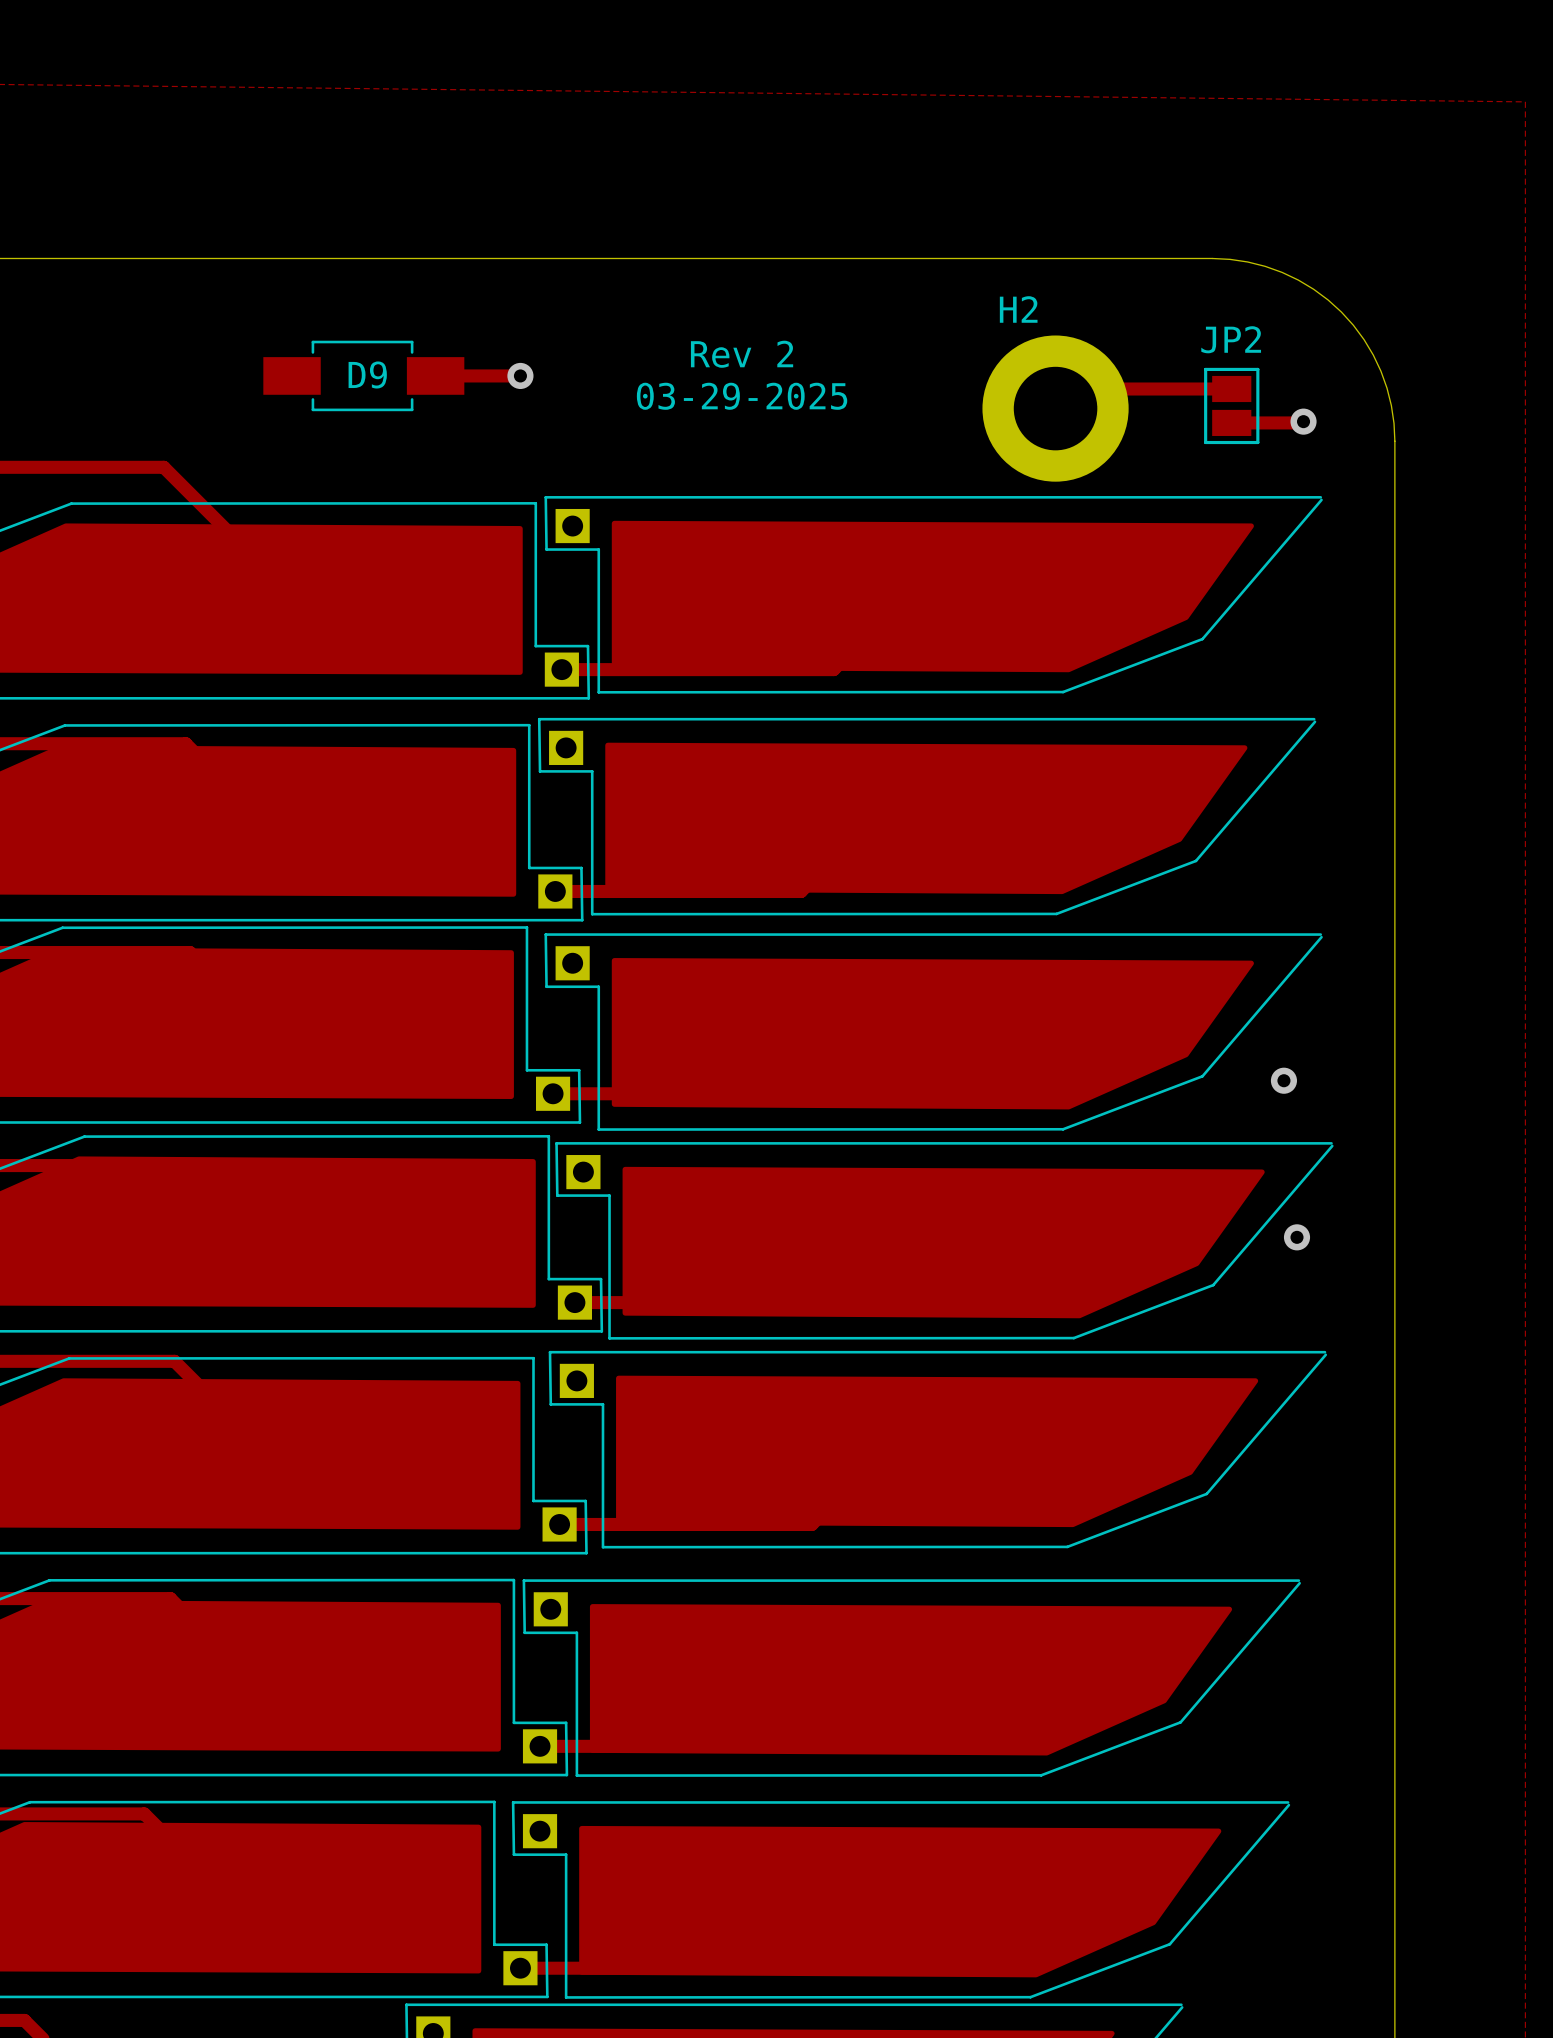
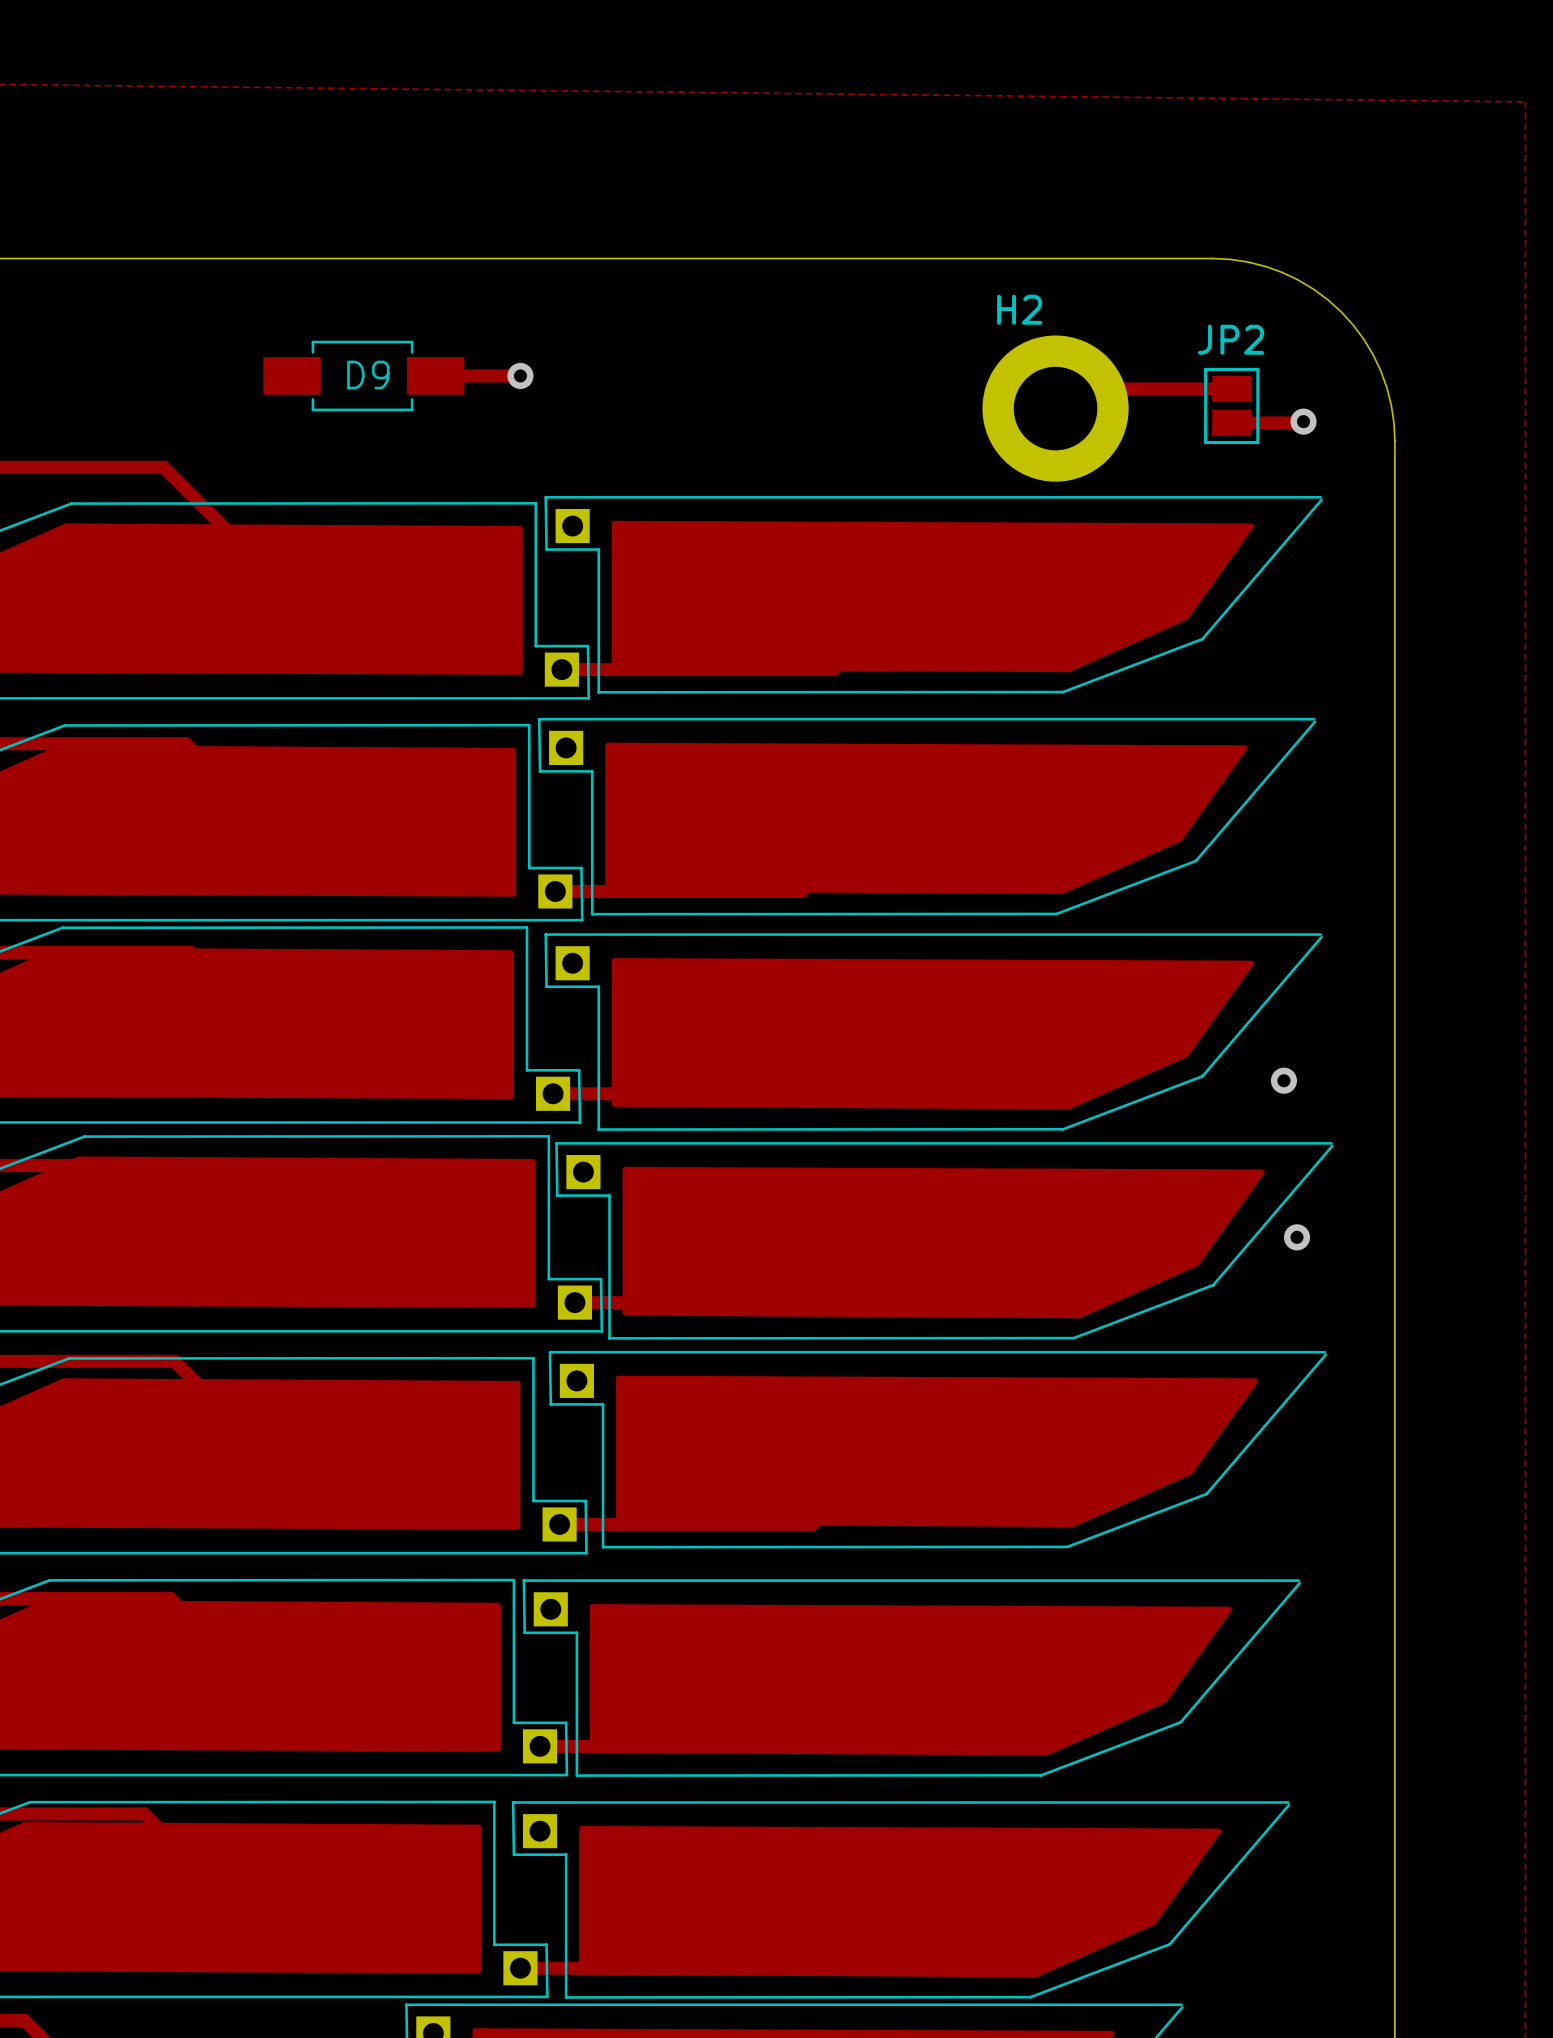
text: Rev 2 (742, 354) -> none
text: 03-29-2025 (742, 396) -> none

